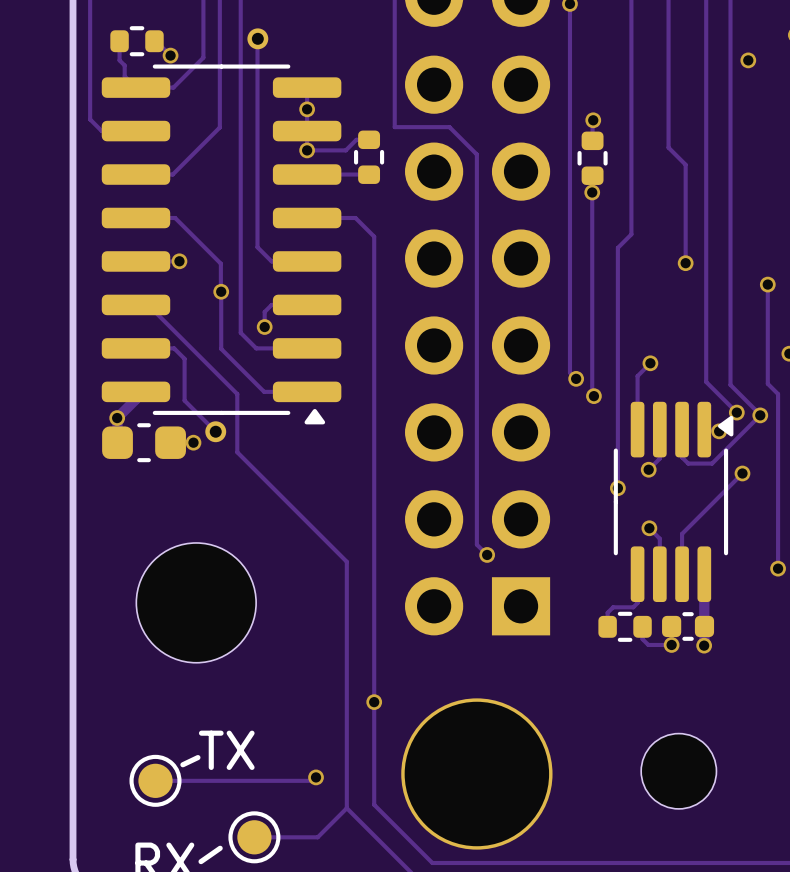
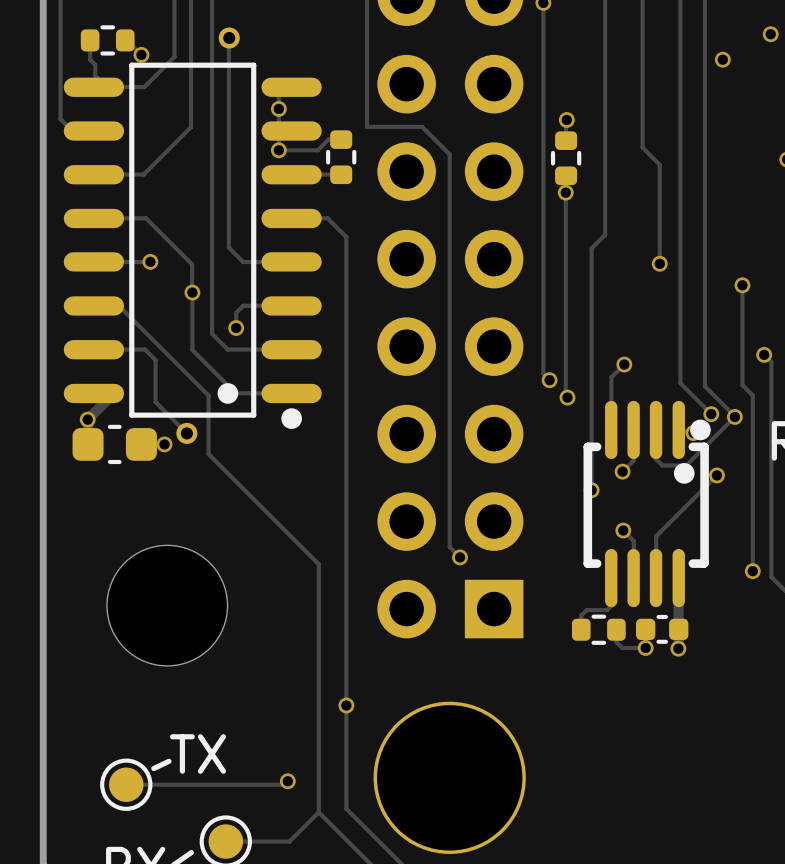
part footprint: [101, 64, 342, 425] -> [63, 62, 322, 429]
part footprint: [613, 401, 734, 603] -> [583, 400, 711, 608]
part: (678, 771) -> none

